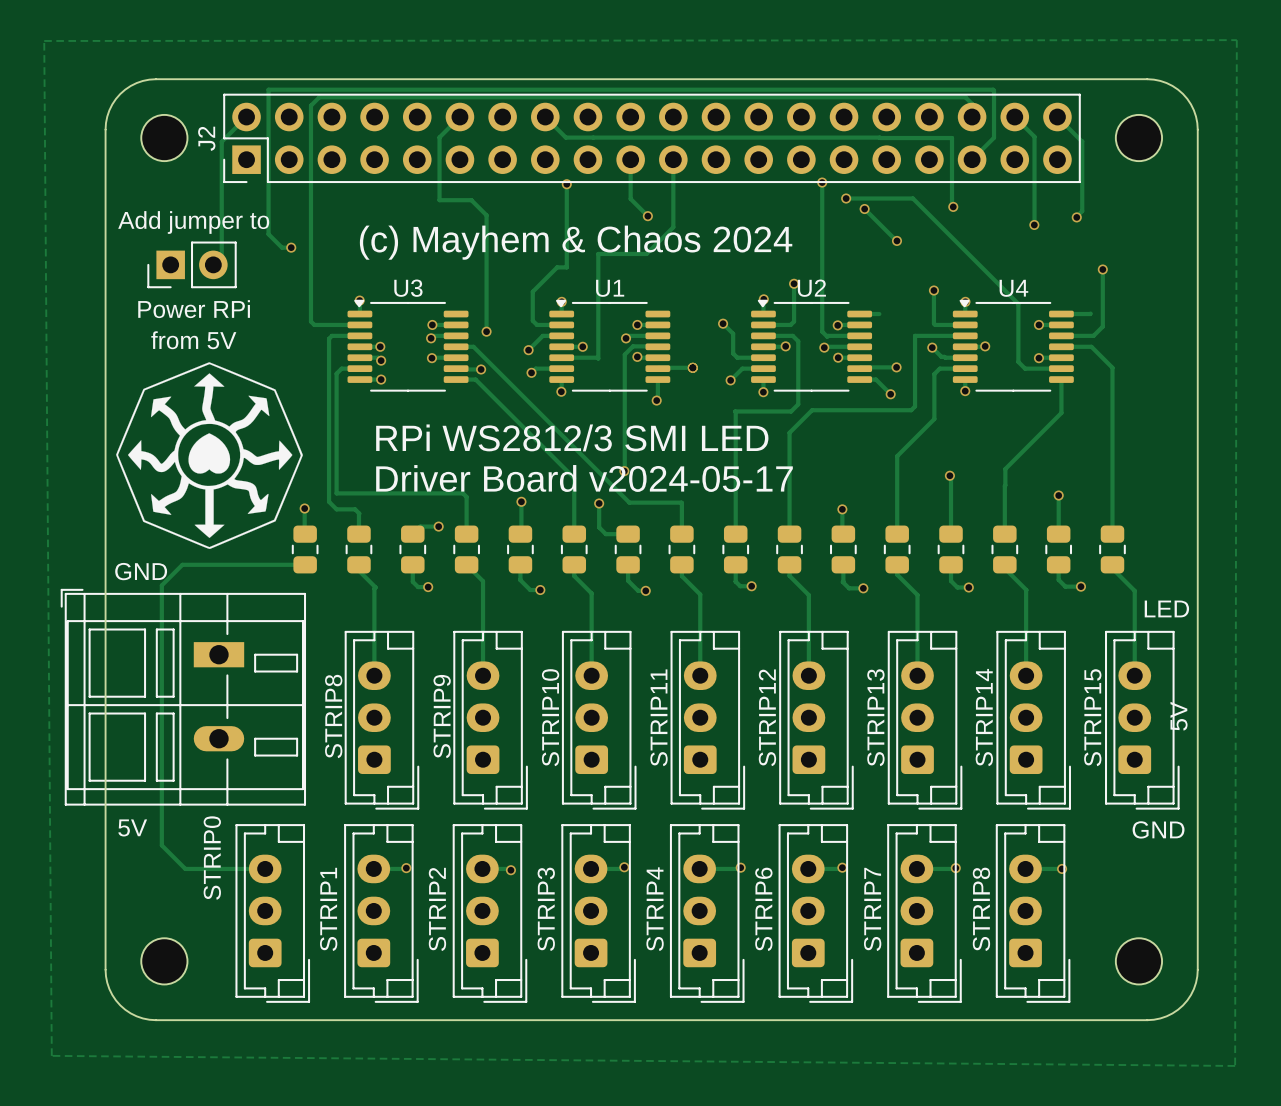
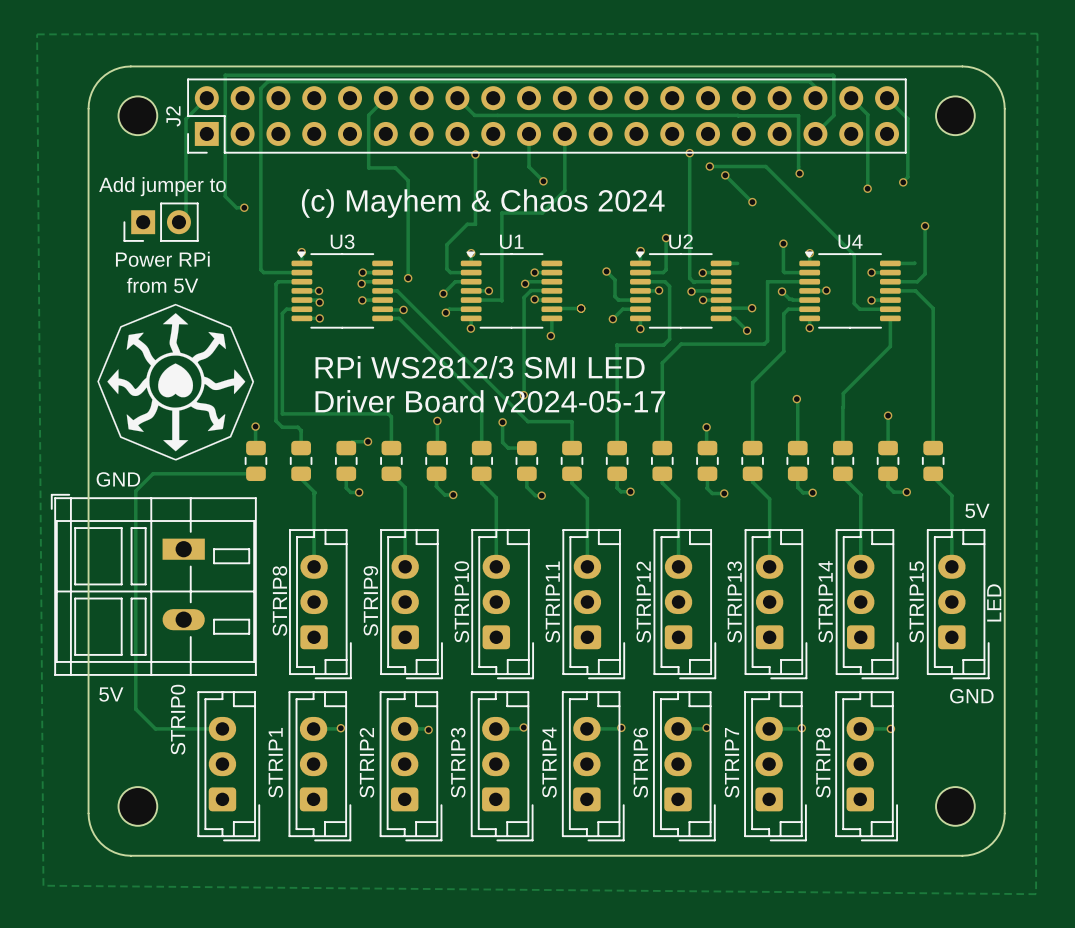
text rotation: 0° (1166, 608) -> 90° counterclockwise (994, 602)
text position: LED (1166, 608) -> LED (994, 602)
text rotation: 0° (1179, 716) -> 90° clockwise (977, 510)
text position: 5V (1179, 716) -> 5V (977, 510)

